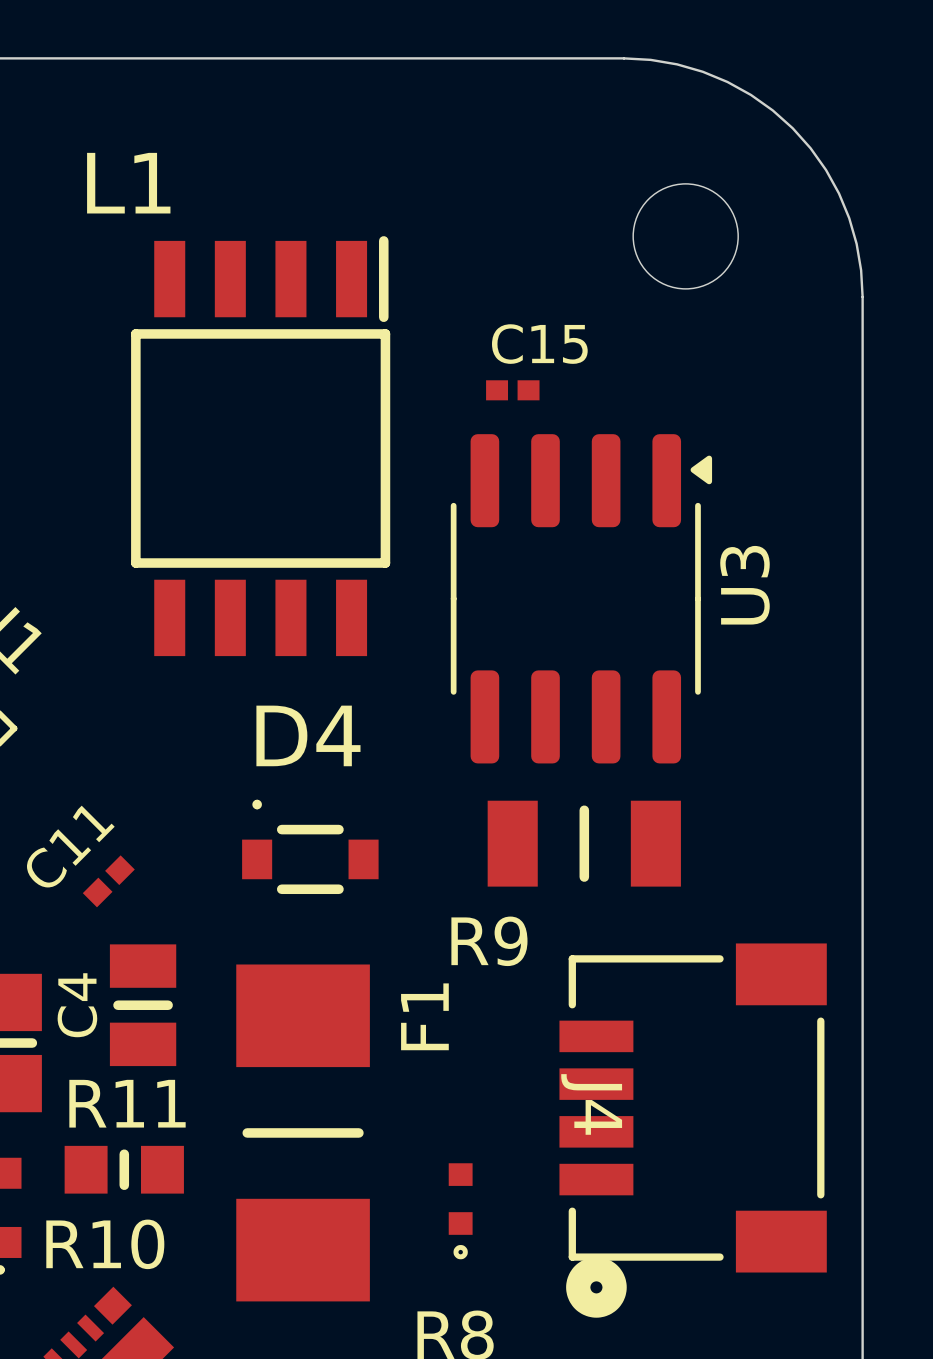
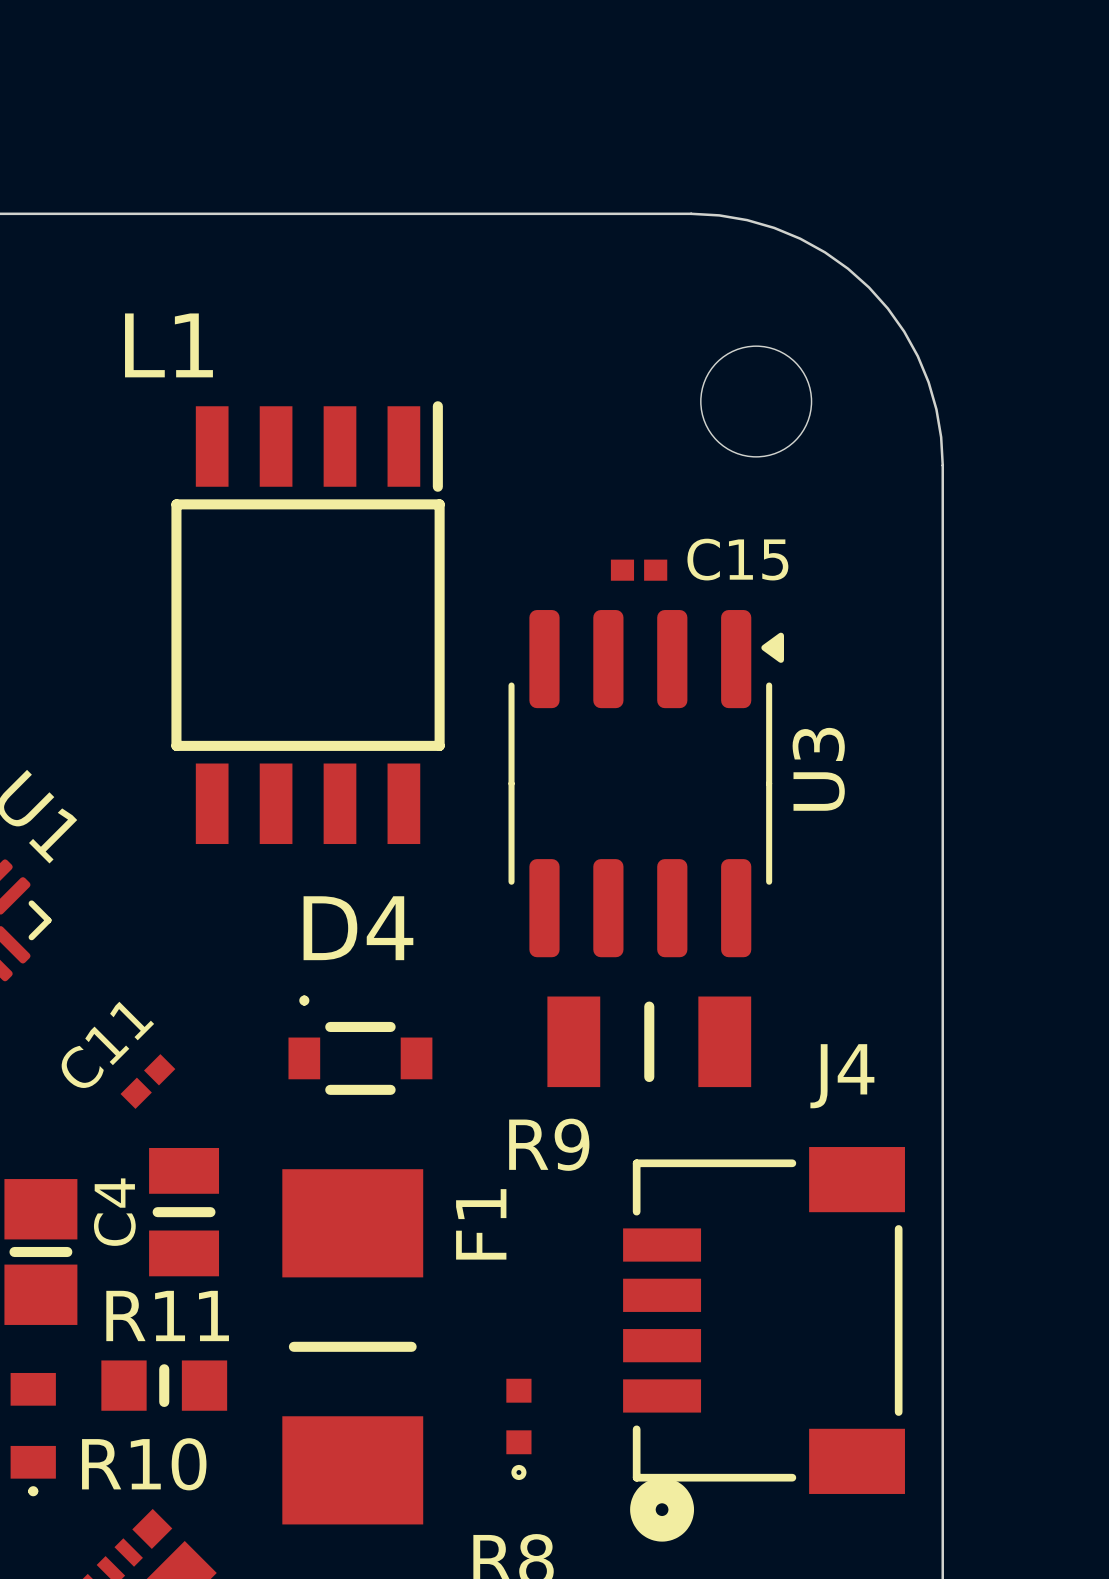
C15 name position: C15 (539, 344) -> C15 (737, 559)
C15 position: (512, 390) -> (639, 570)
J4 name rotation: 0° (591, 1104) -> 90° counterclockwise (842, 1076)
J4 name position: J4 (591, 1104) -> J4 (842, 1076)

